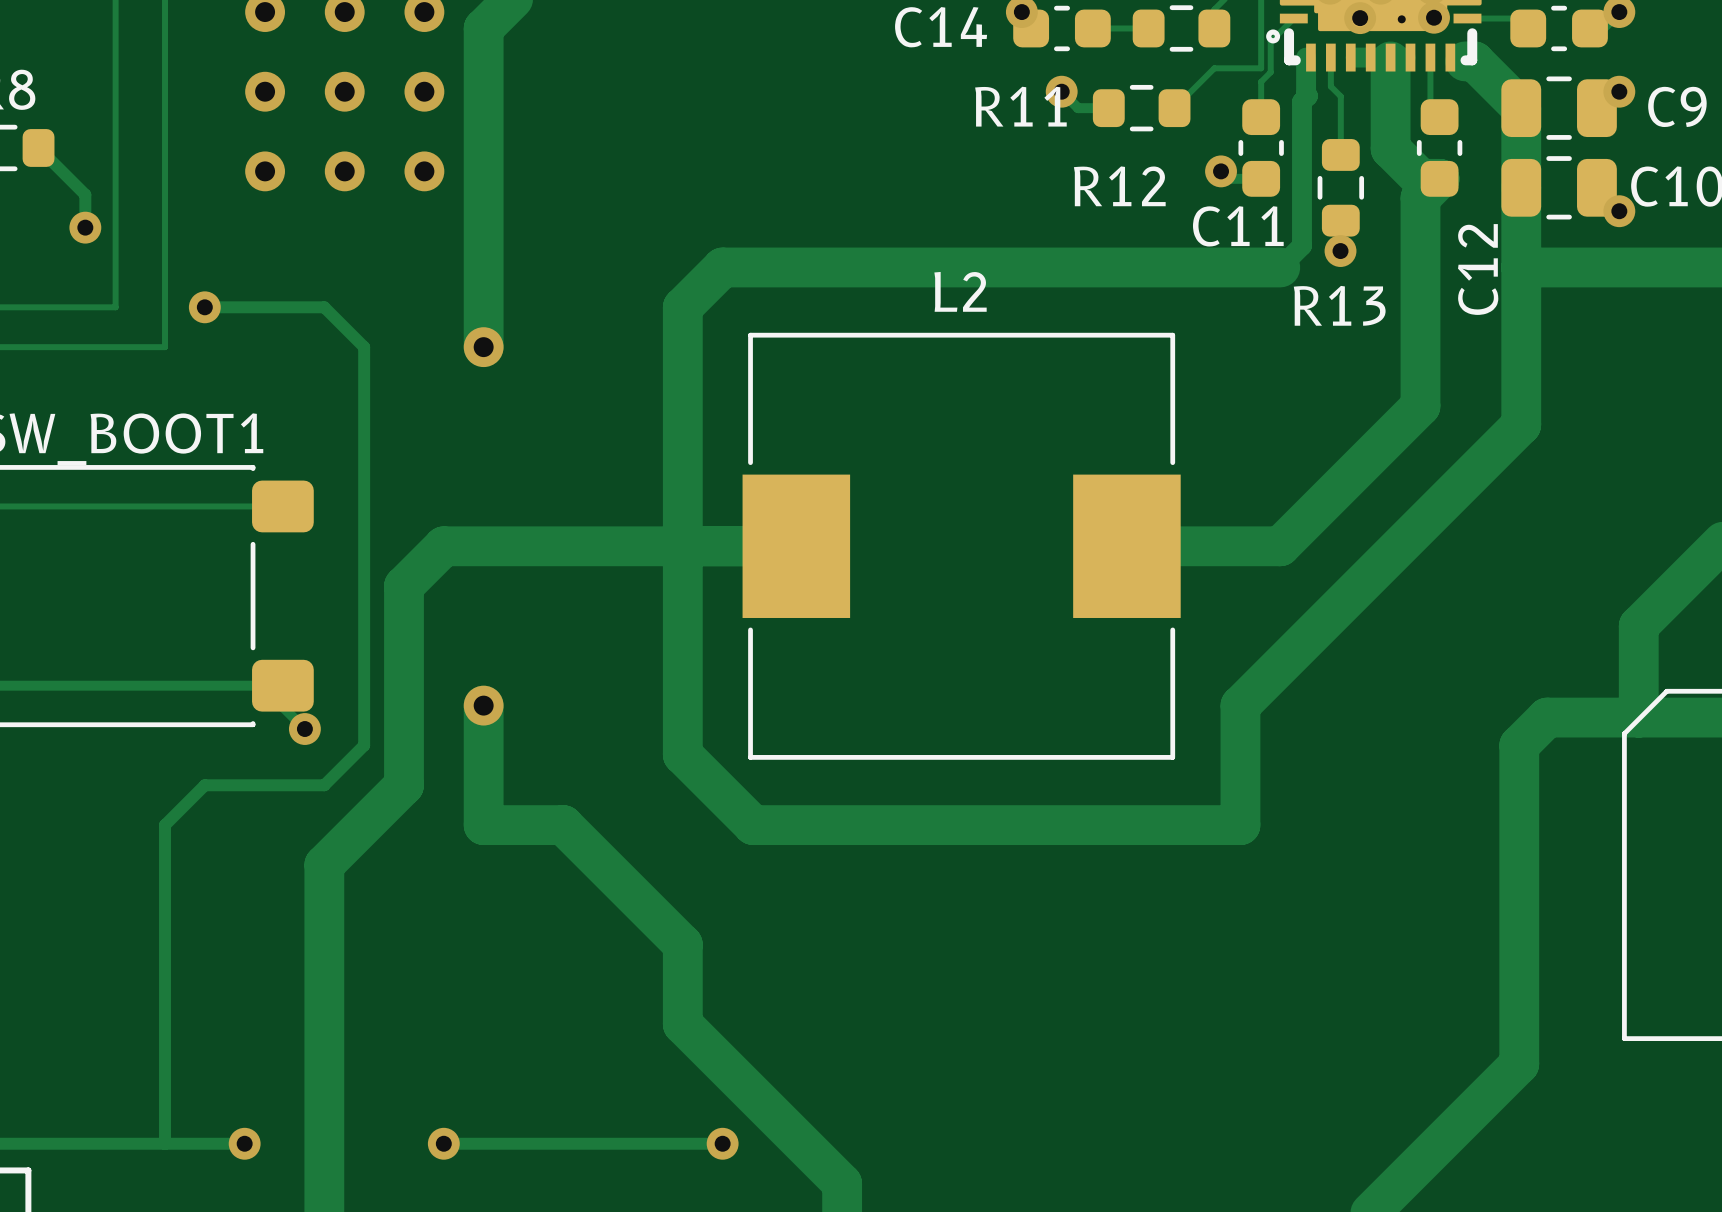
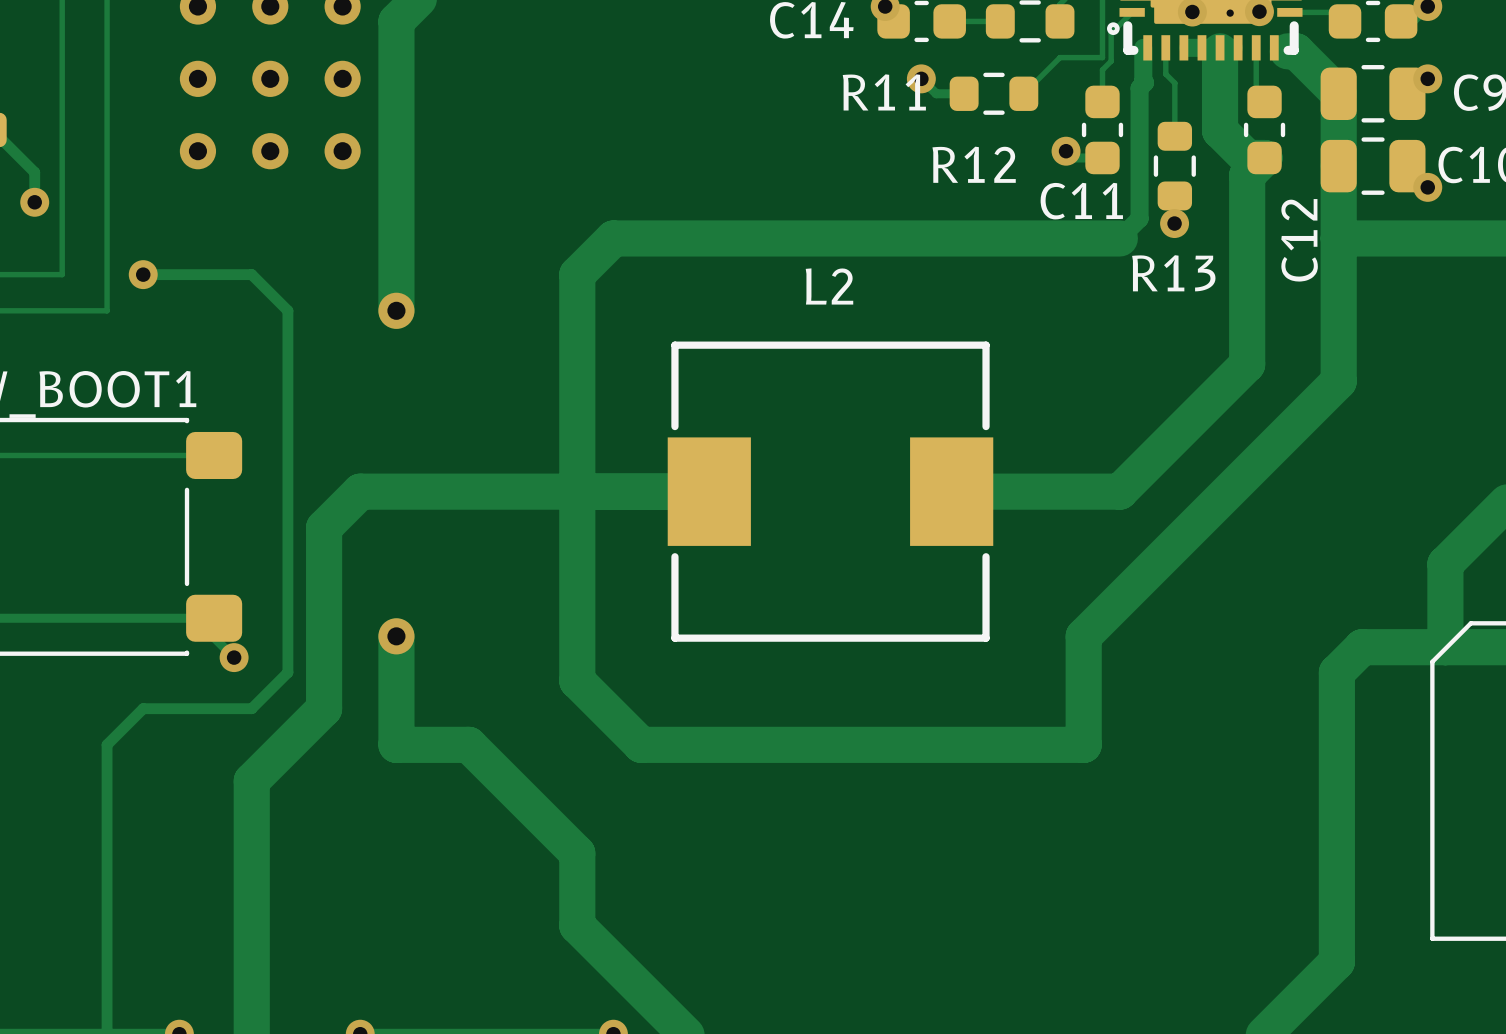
L2 footprint: [742, 332, 1181, 760] -> [667, 341, 994, 642]

